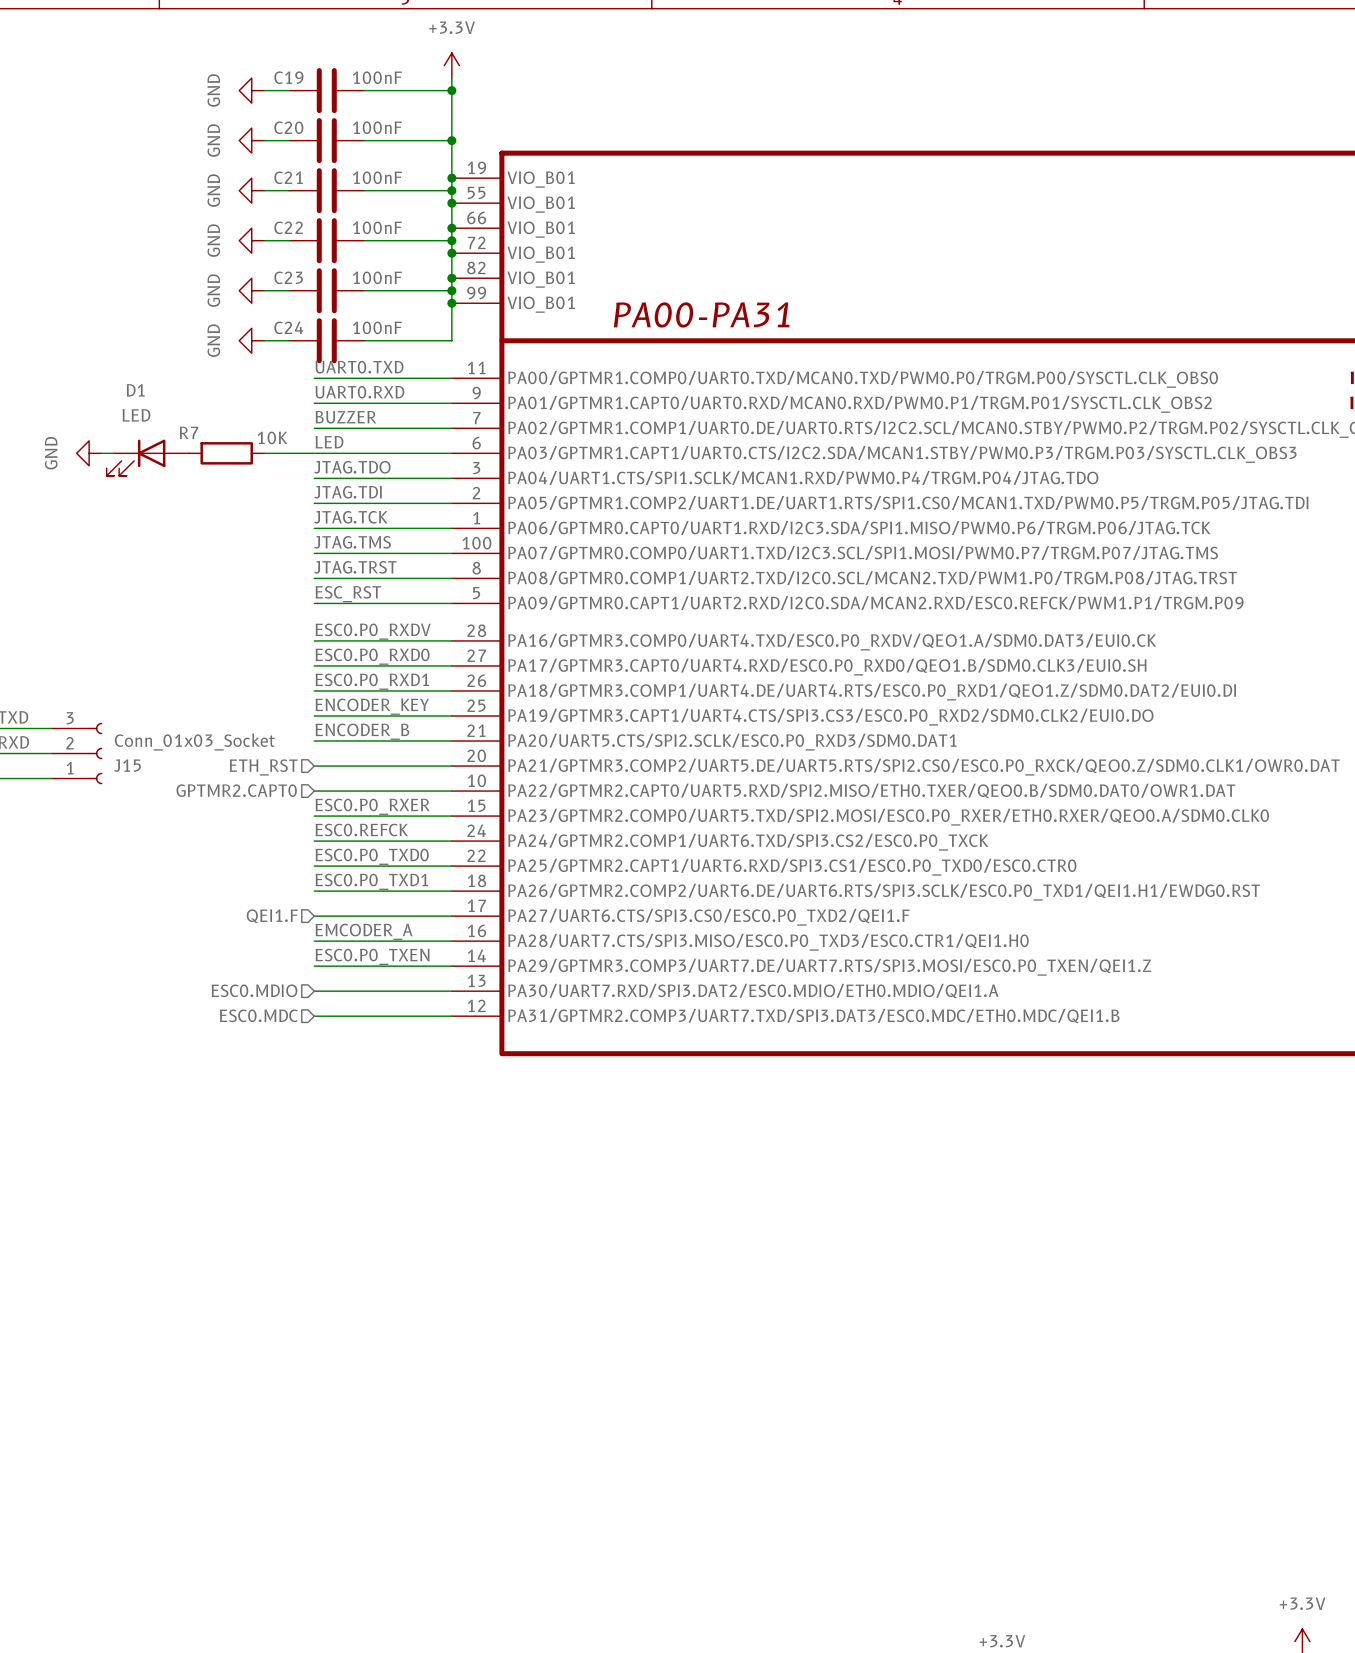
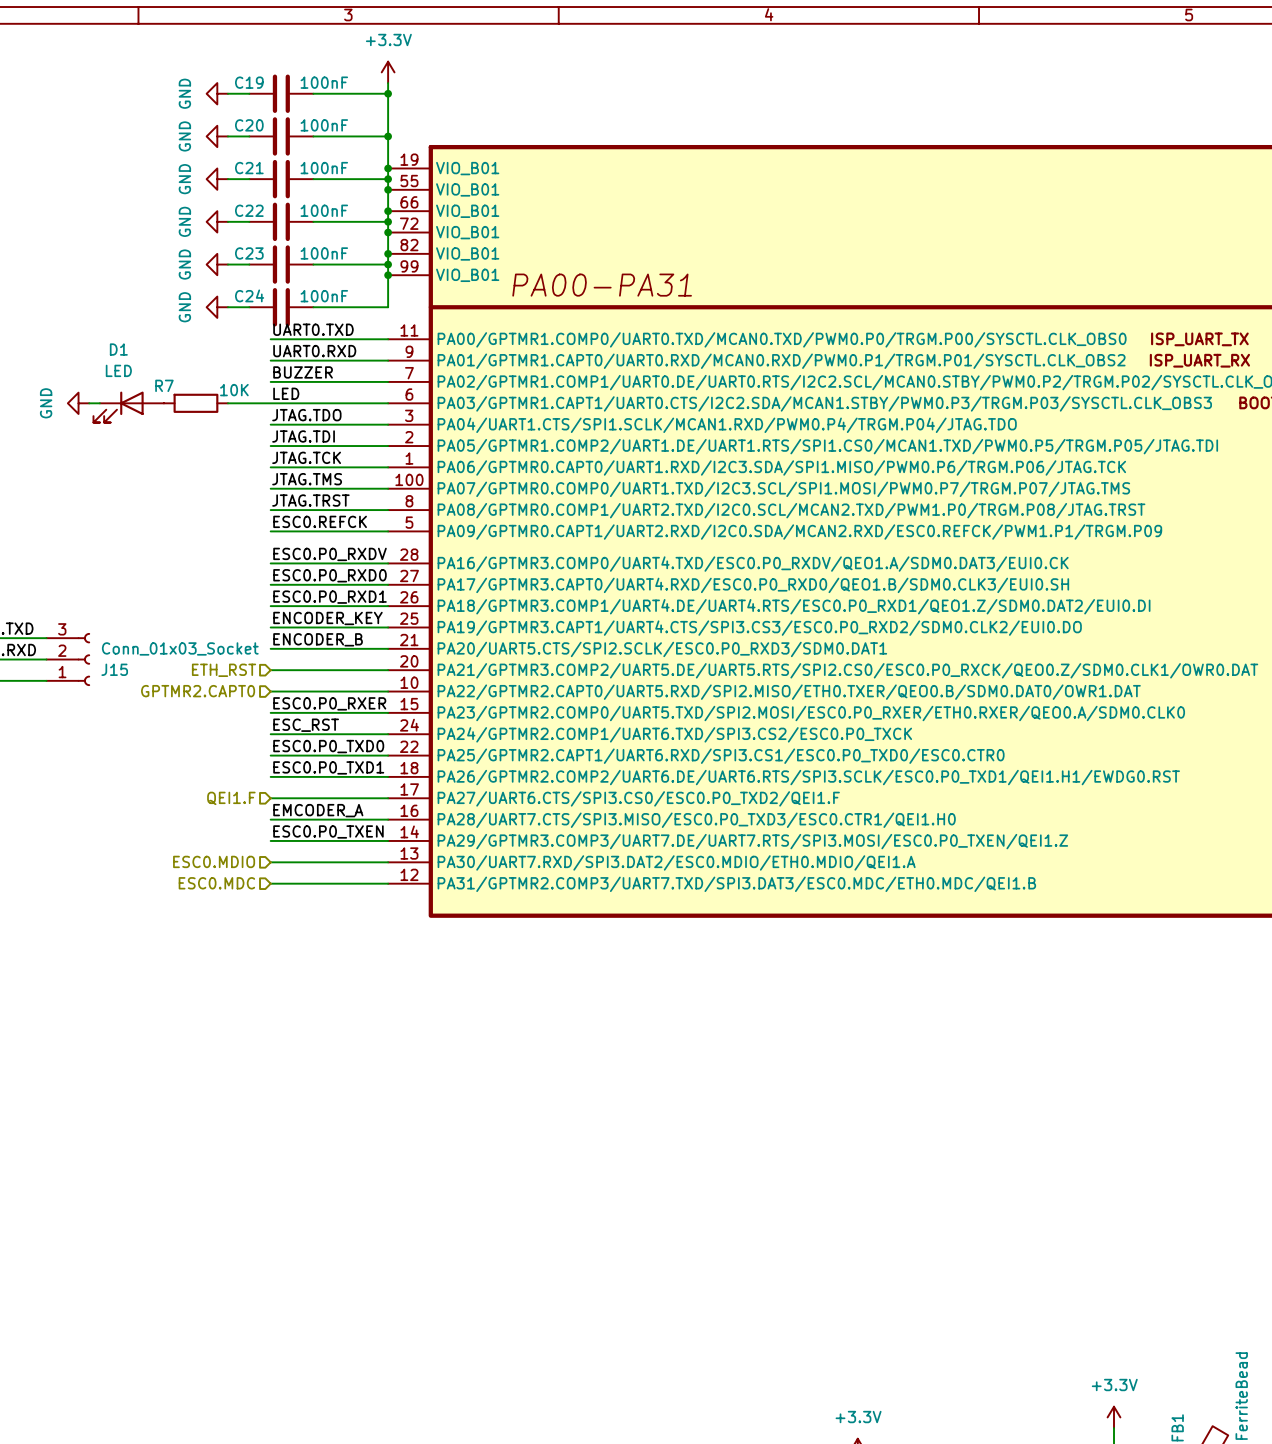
label: ESC_RST (348, 594) -> ESC0.REFCK (320, 521)
label: ESC0.REFCK (361, 829) -> ESC_RST (306, 725)

